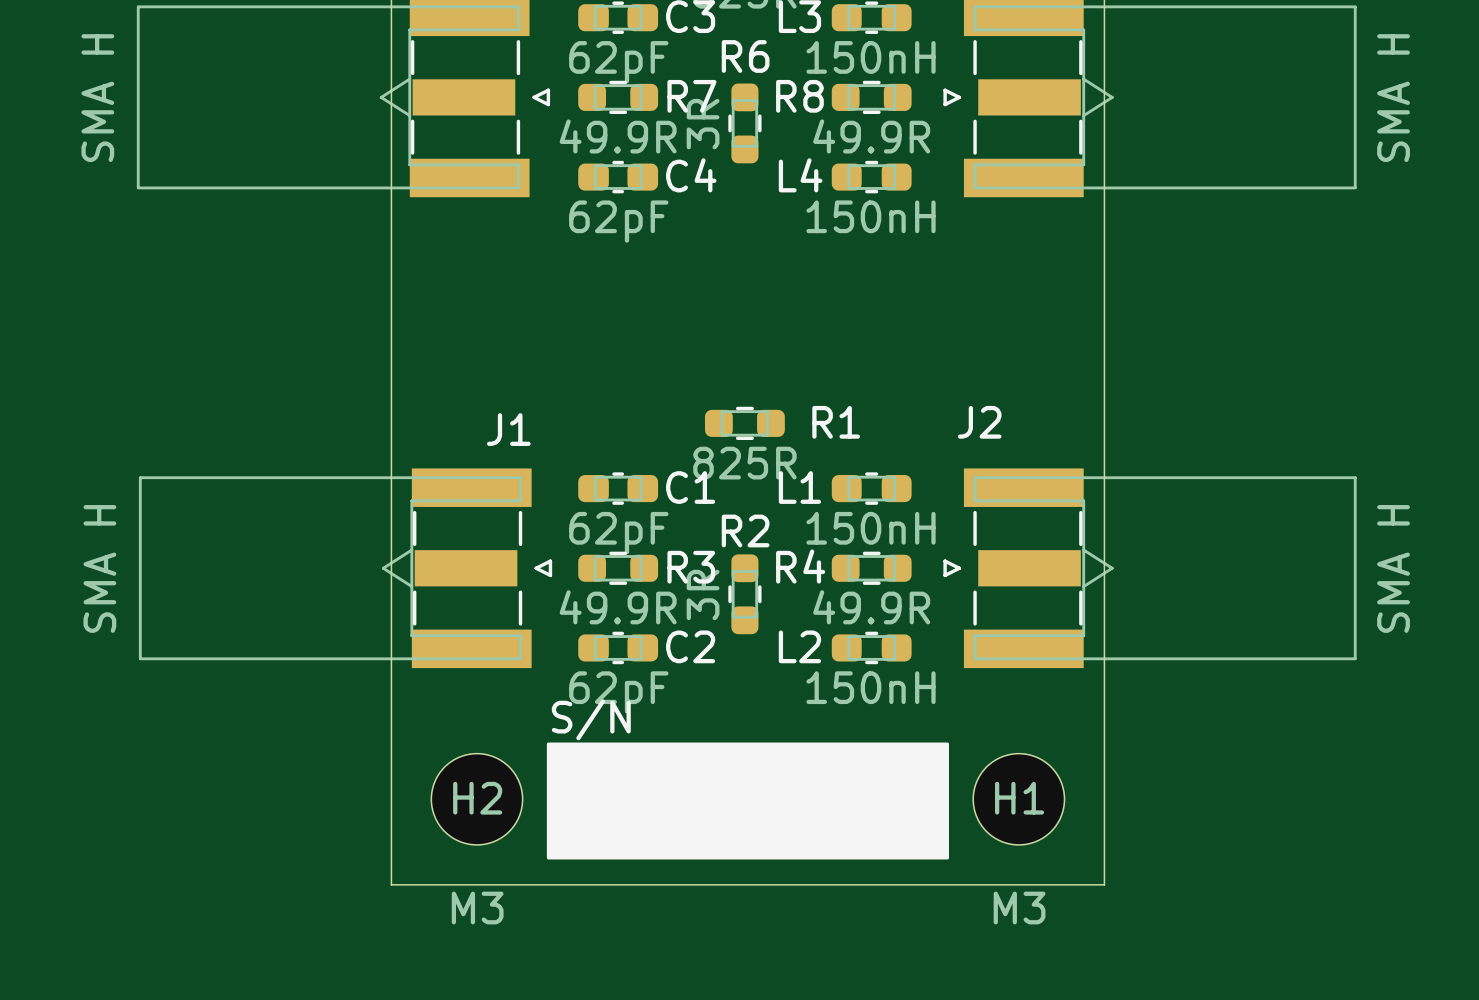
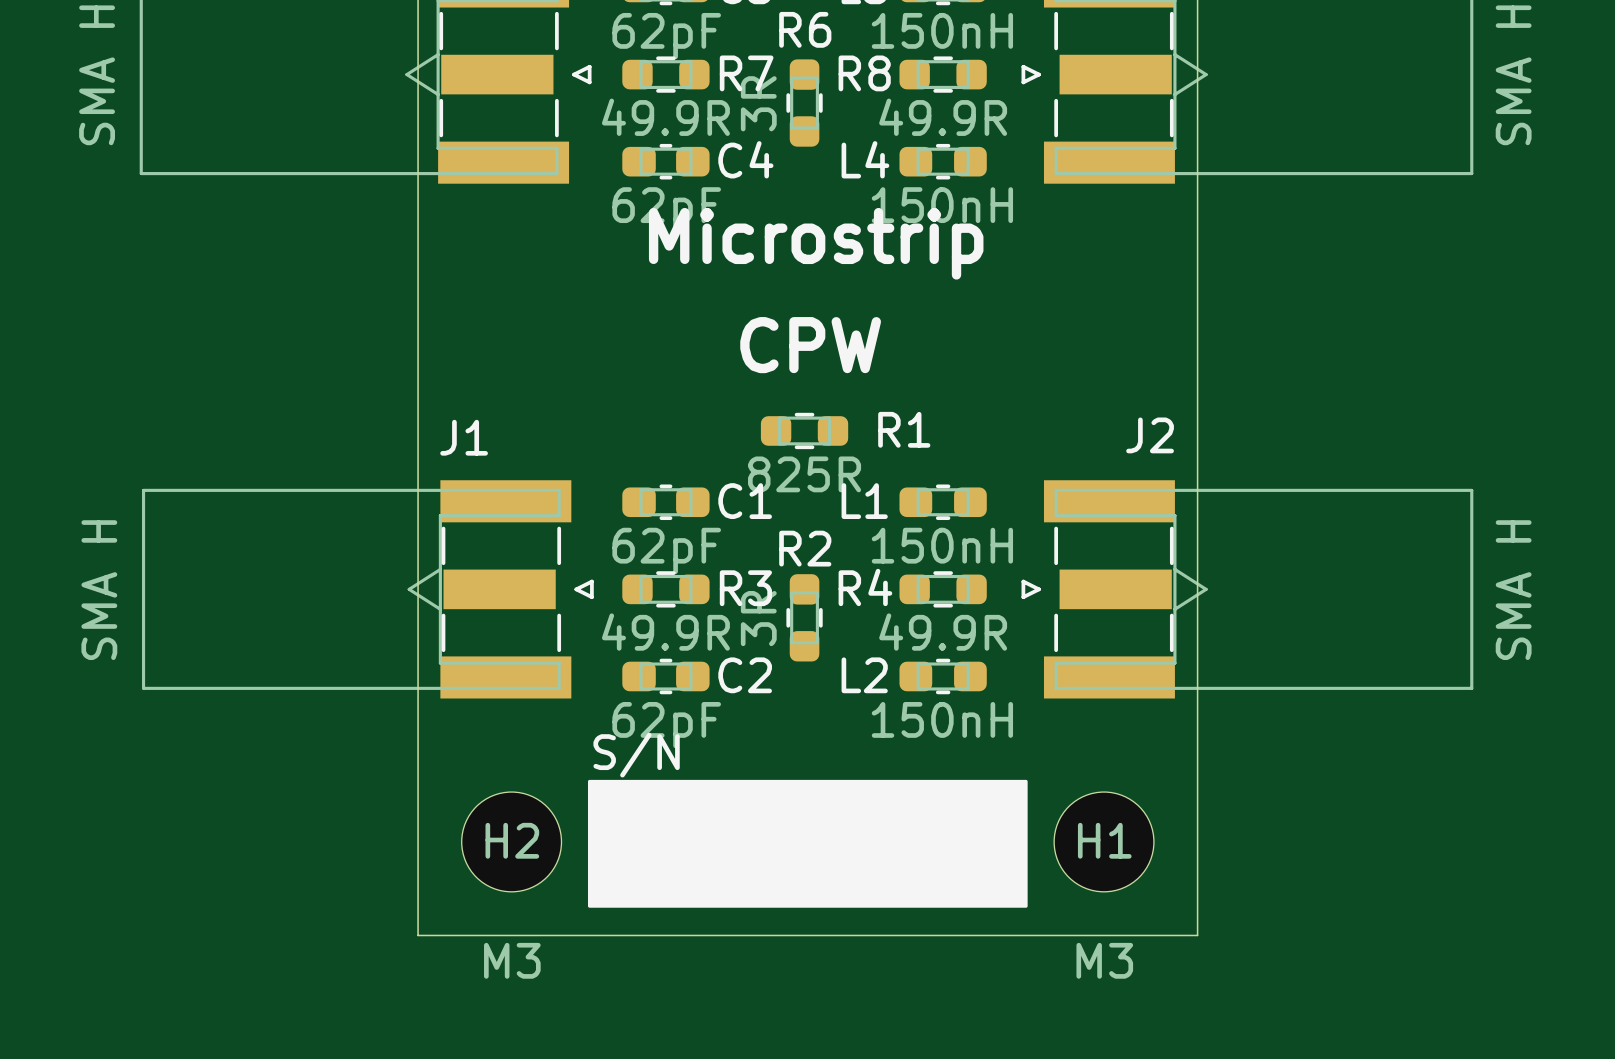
text: none -> Microstrip (816, 243)
text: none -> CPW (810, 345)
J2 name position: J2 (979, 422) -> J2 (1150, 435)
J1 name position: J1 (508, 429) -> J1 (464, 437)

